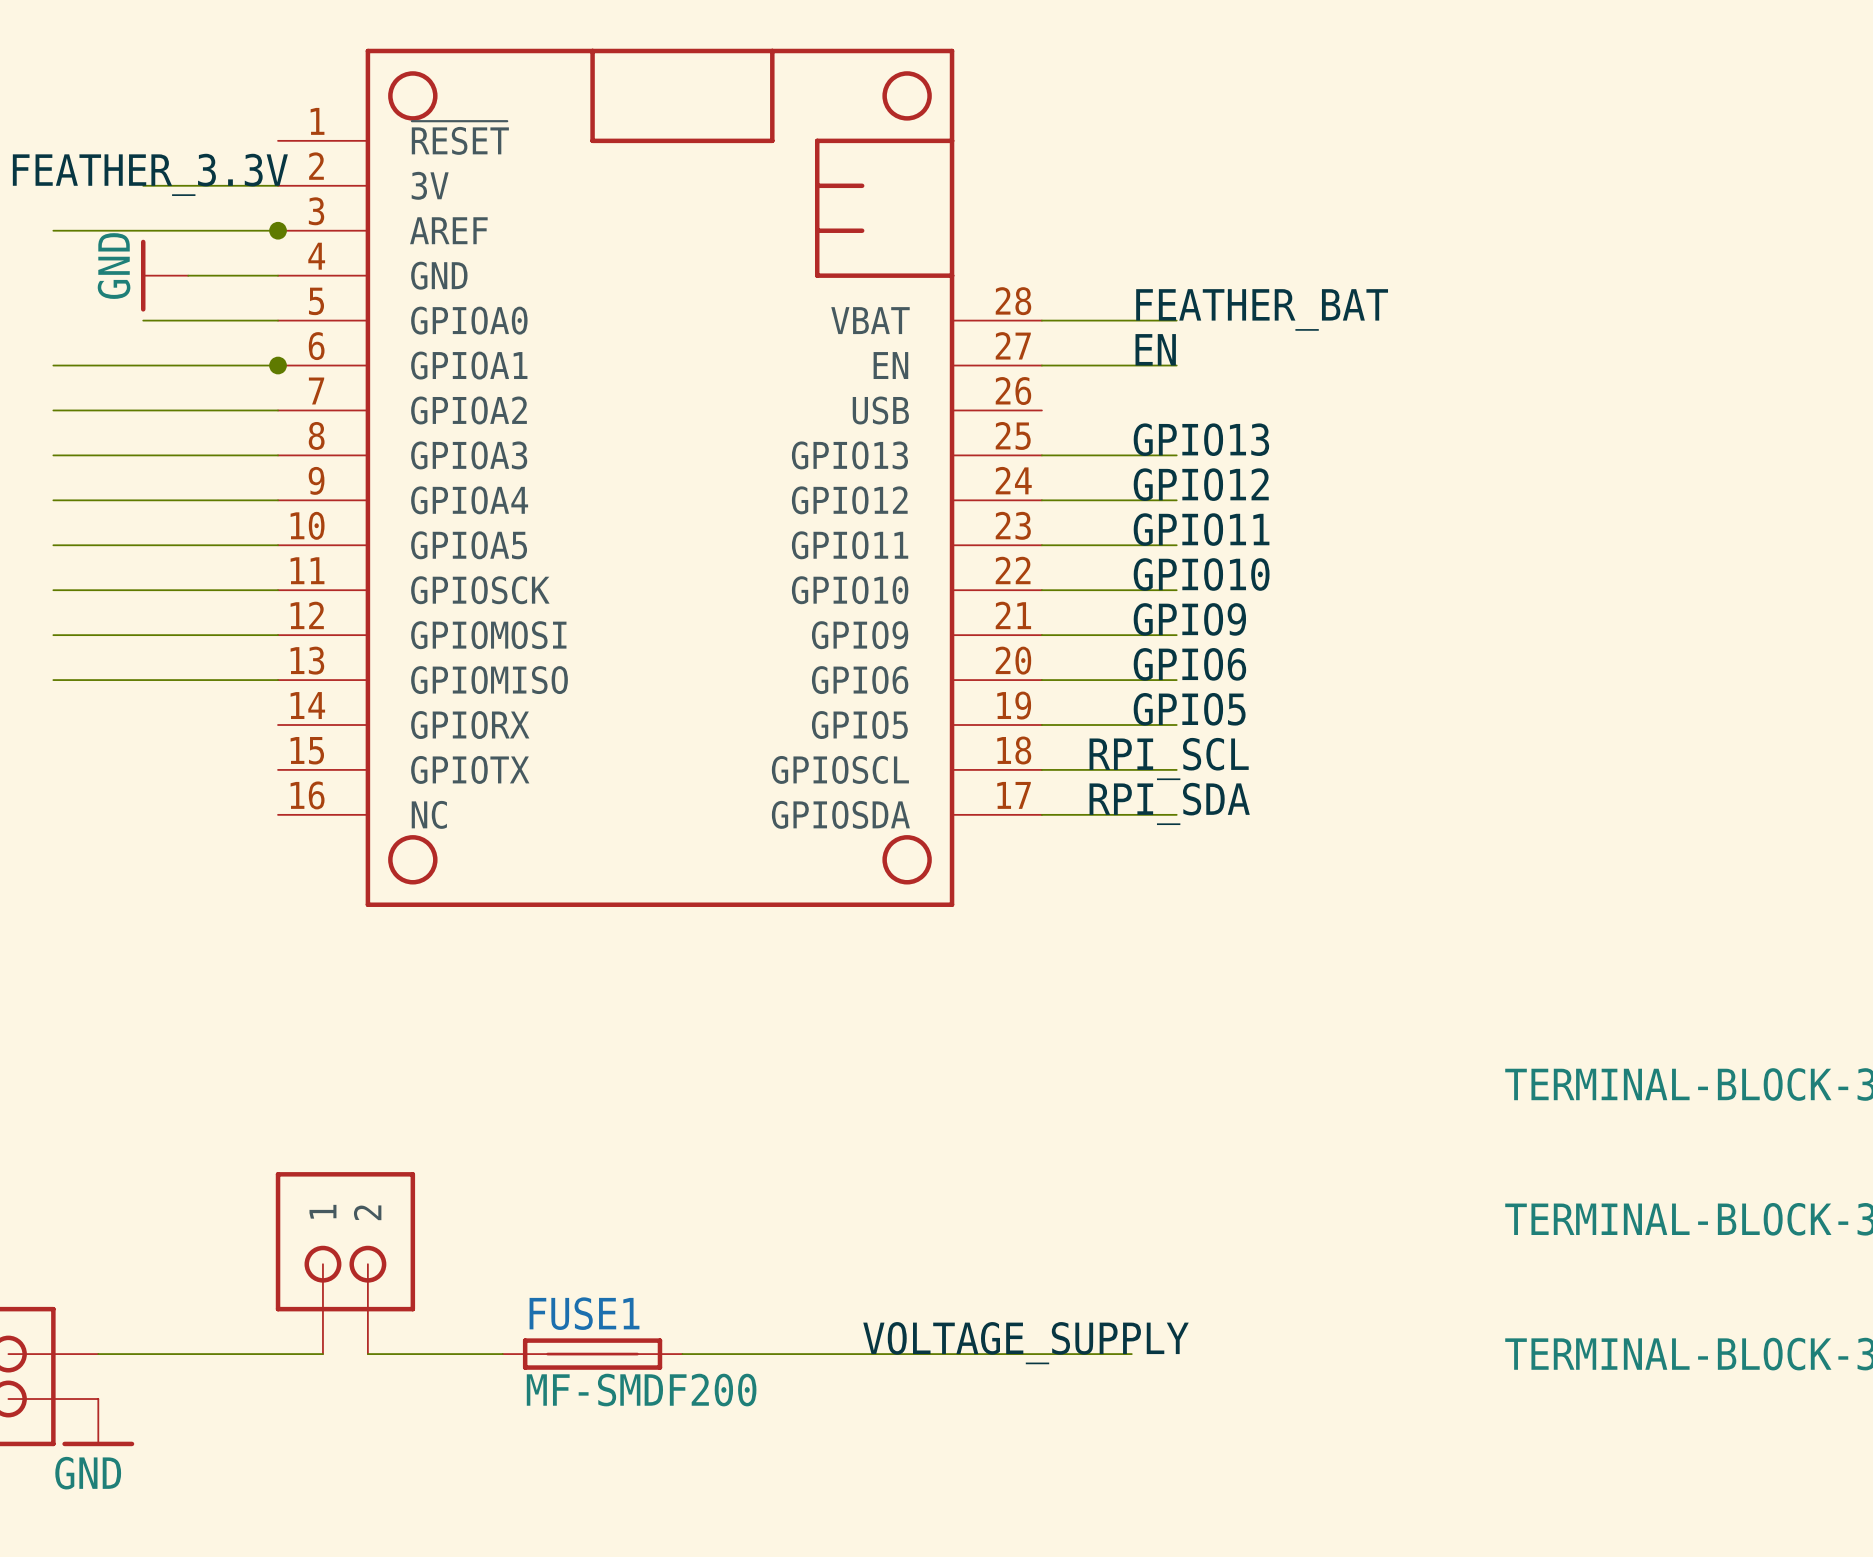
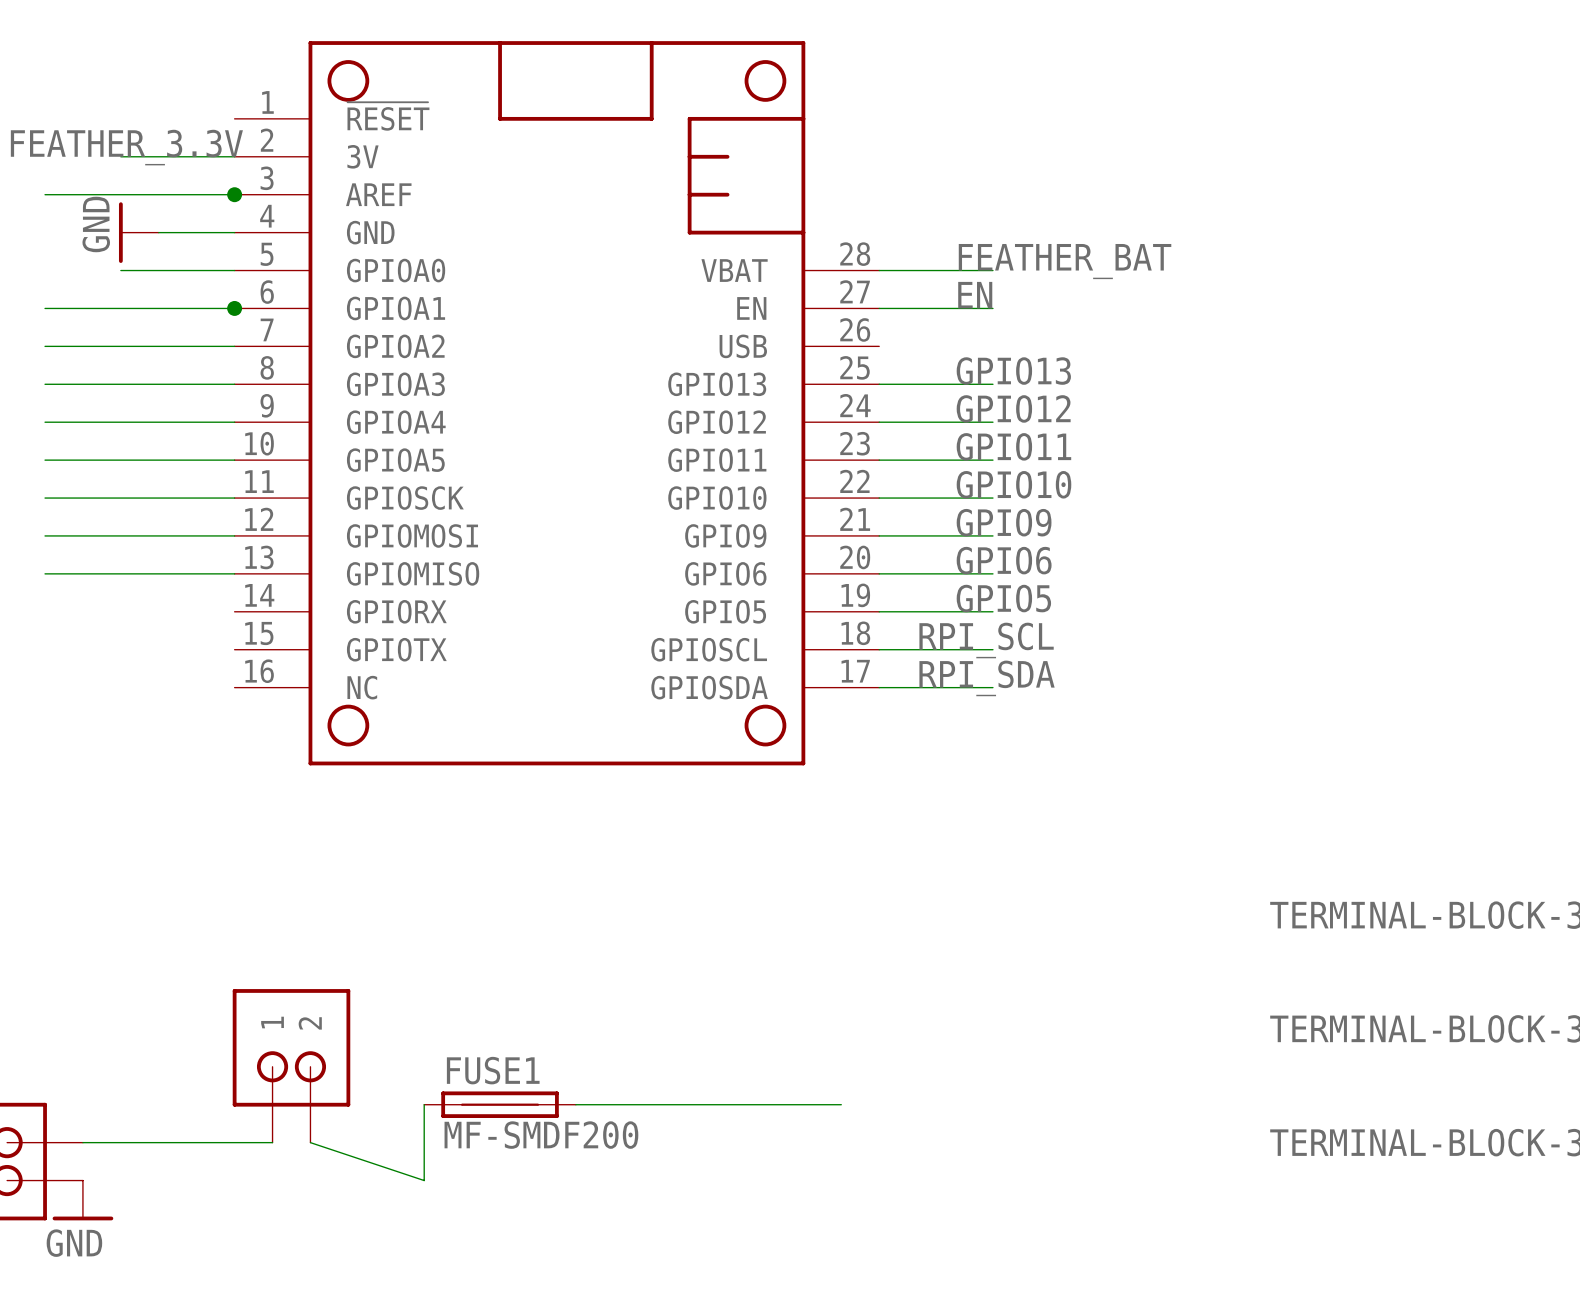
wire: none -> (575, 1104) (841, 1104)
label: VOLTAGE_SUPPLY (1026, 1343) -> none
wire: (367, 1354) (502, 1354) -> (310, 1142) (424, 1180) (424, 1104)
FUSE1 position: (592, 1354) -> (500, 1104)
wire: (682, 1354) (1131, 1354) -> none

